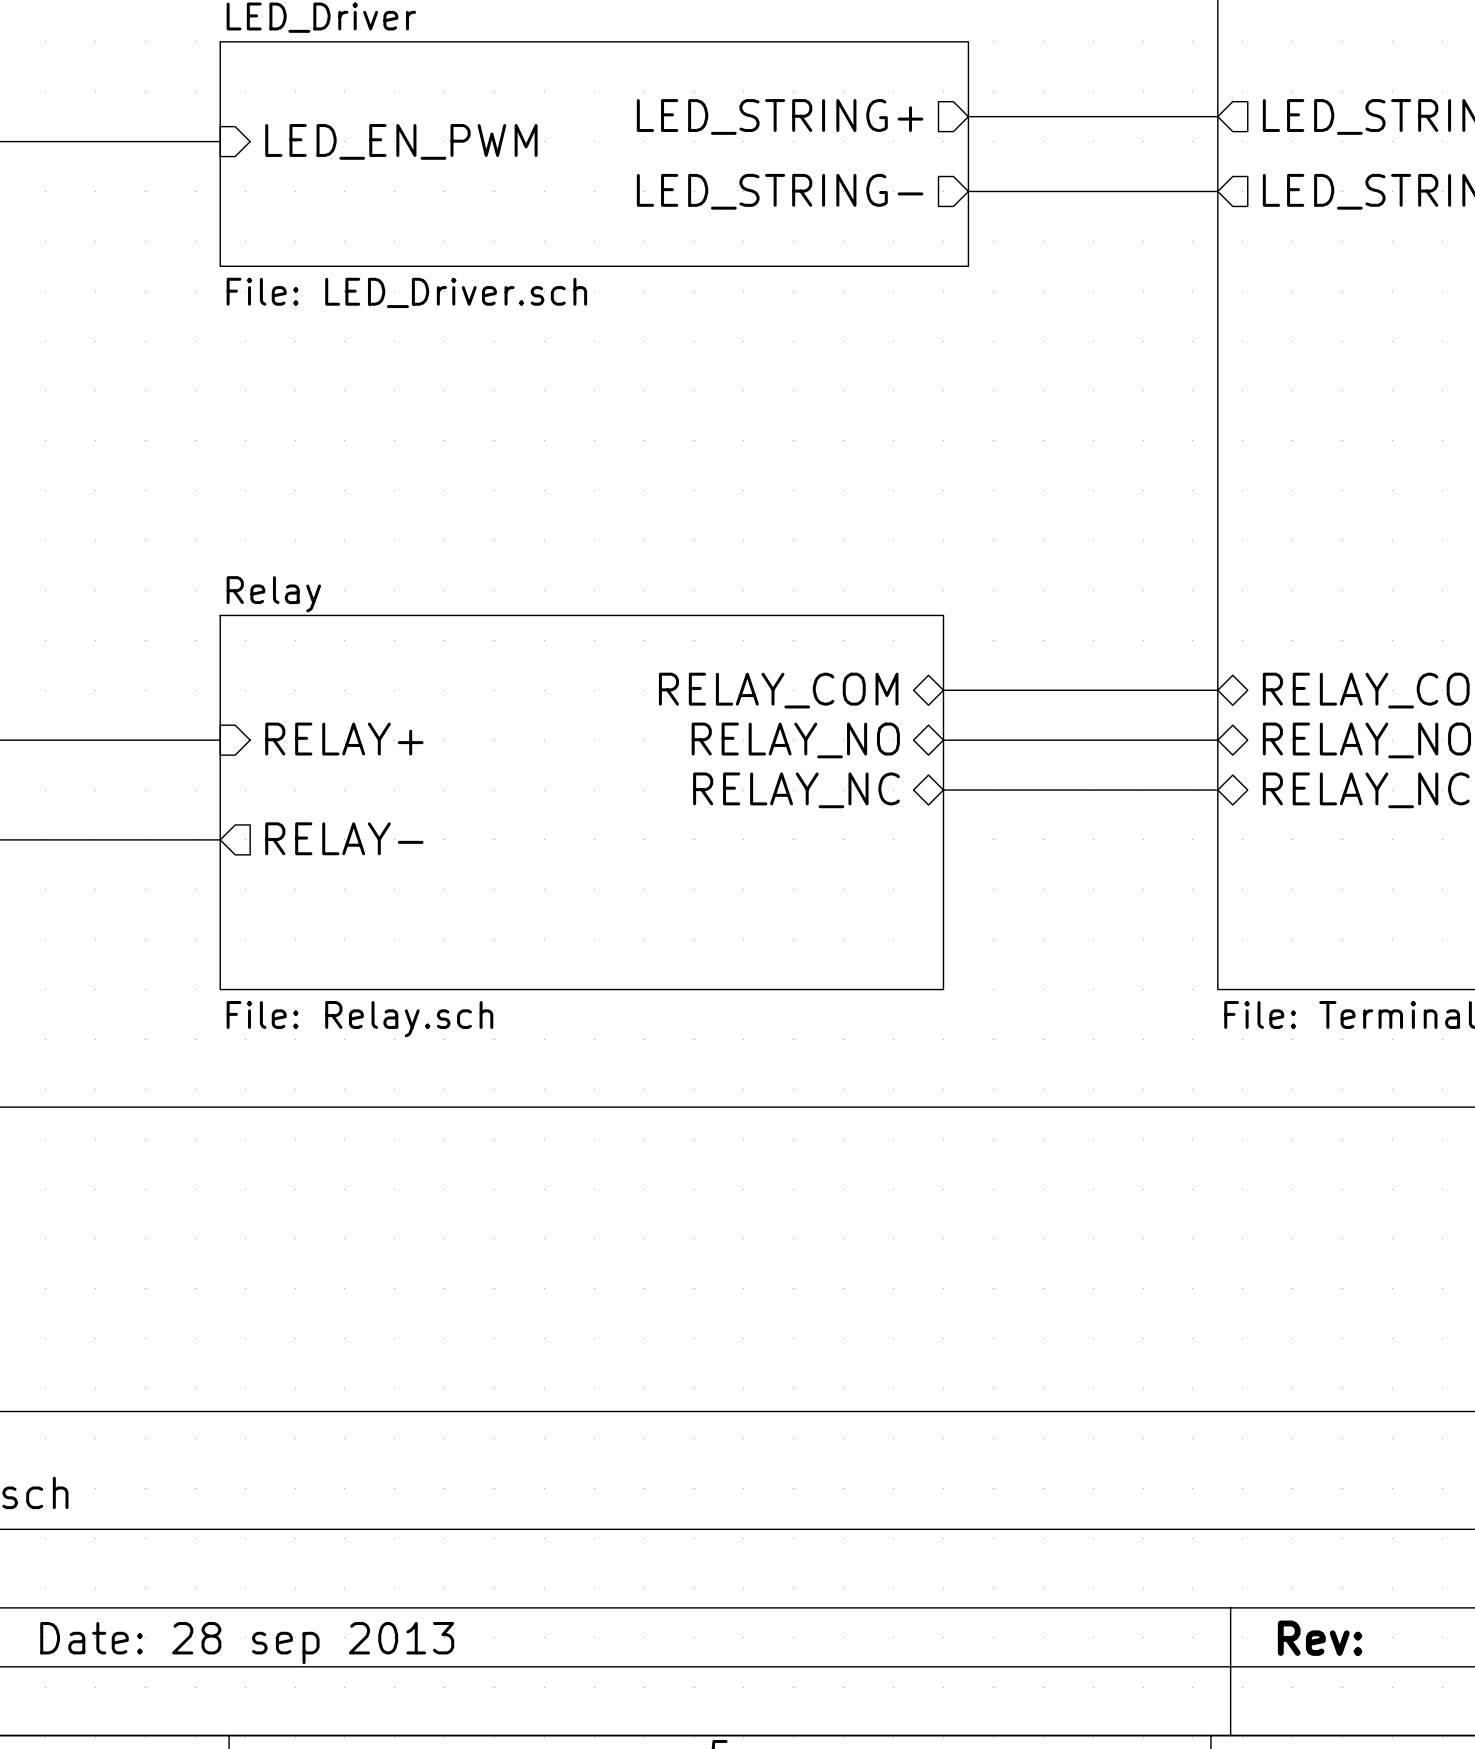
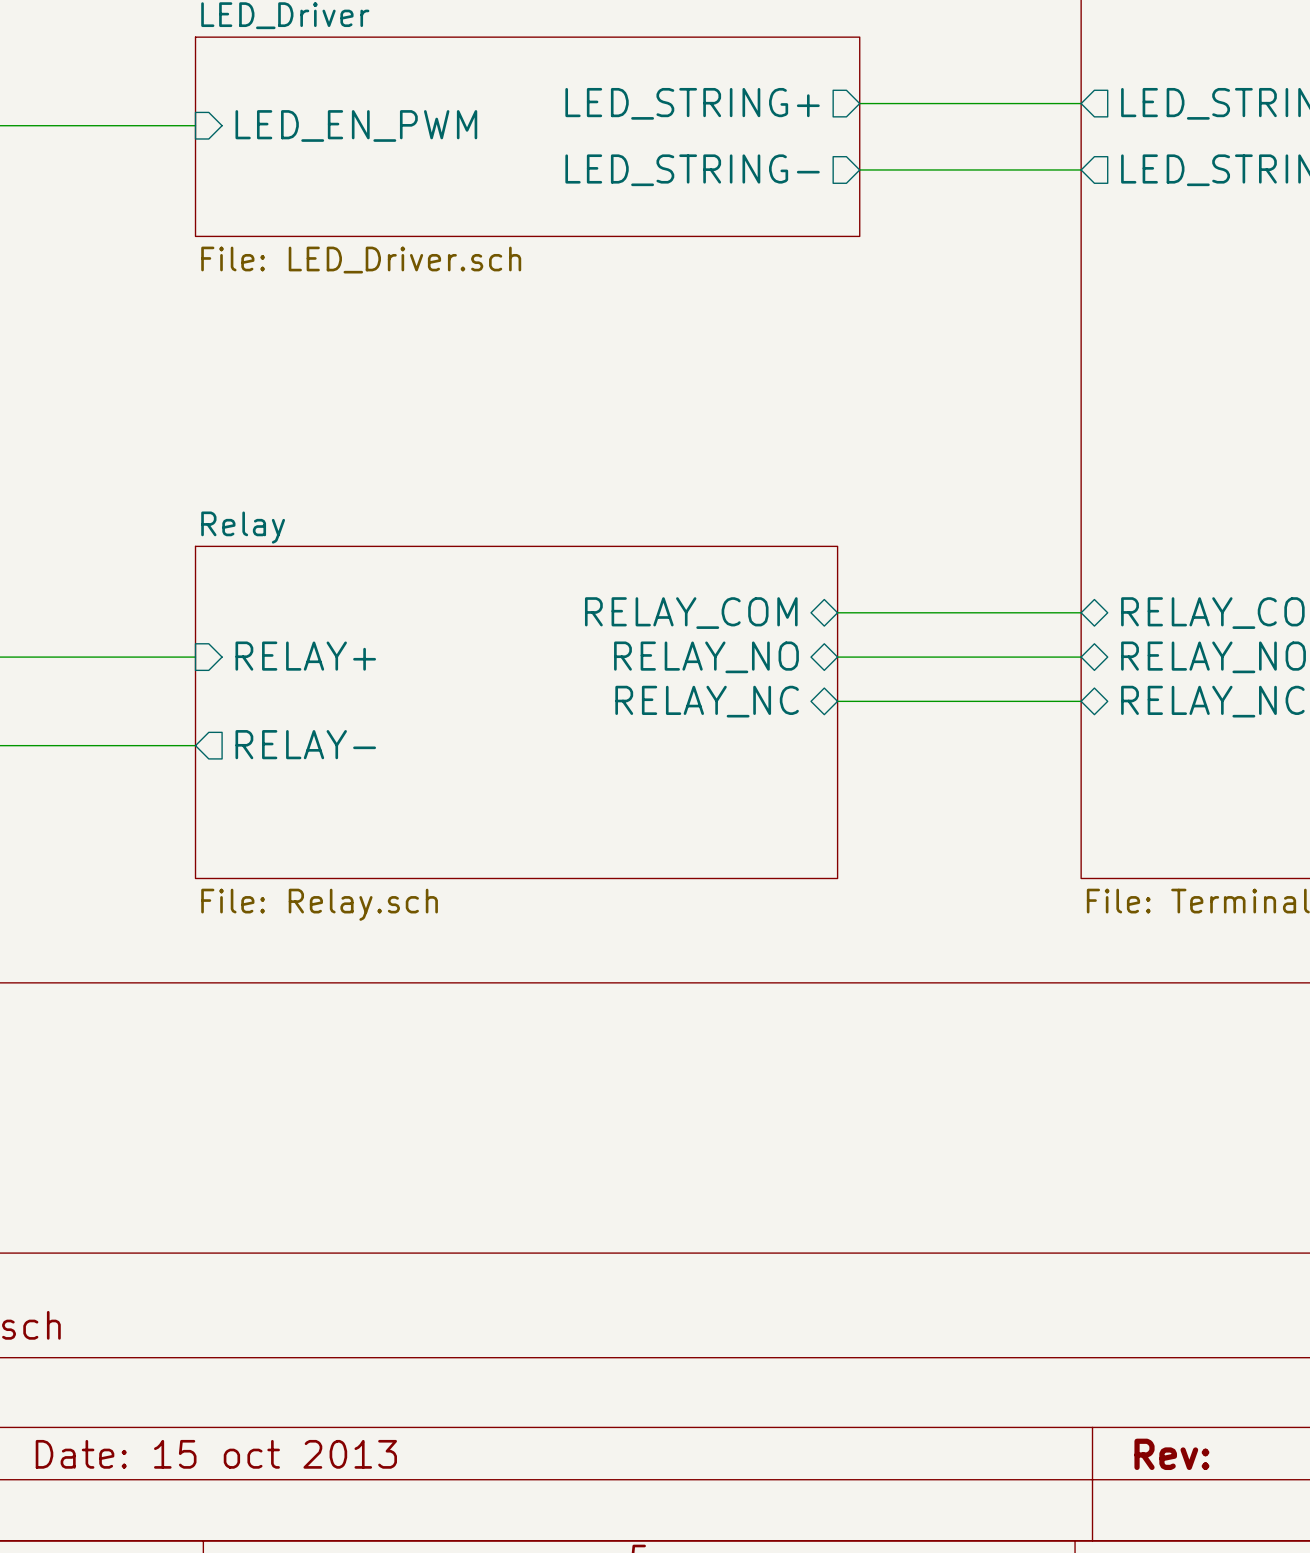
title block: Date: 28 sep 2013 (247, 1643) -> Date: 15 oct 2013 (216, 1454)

